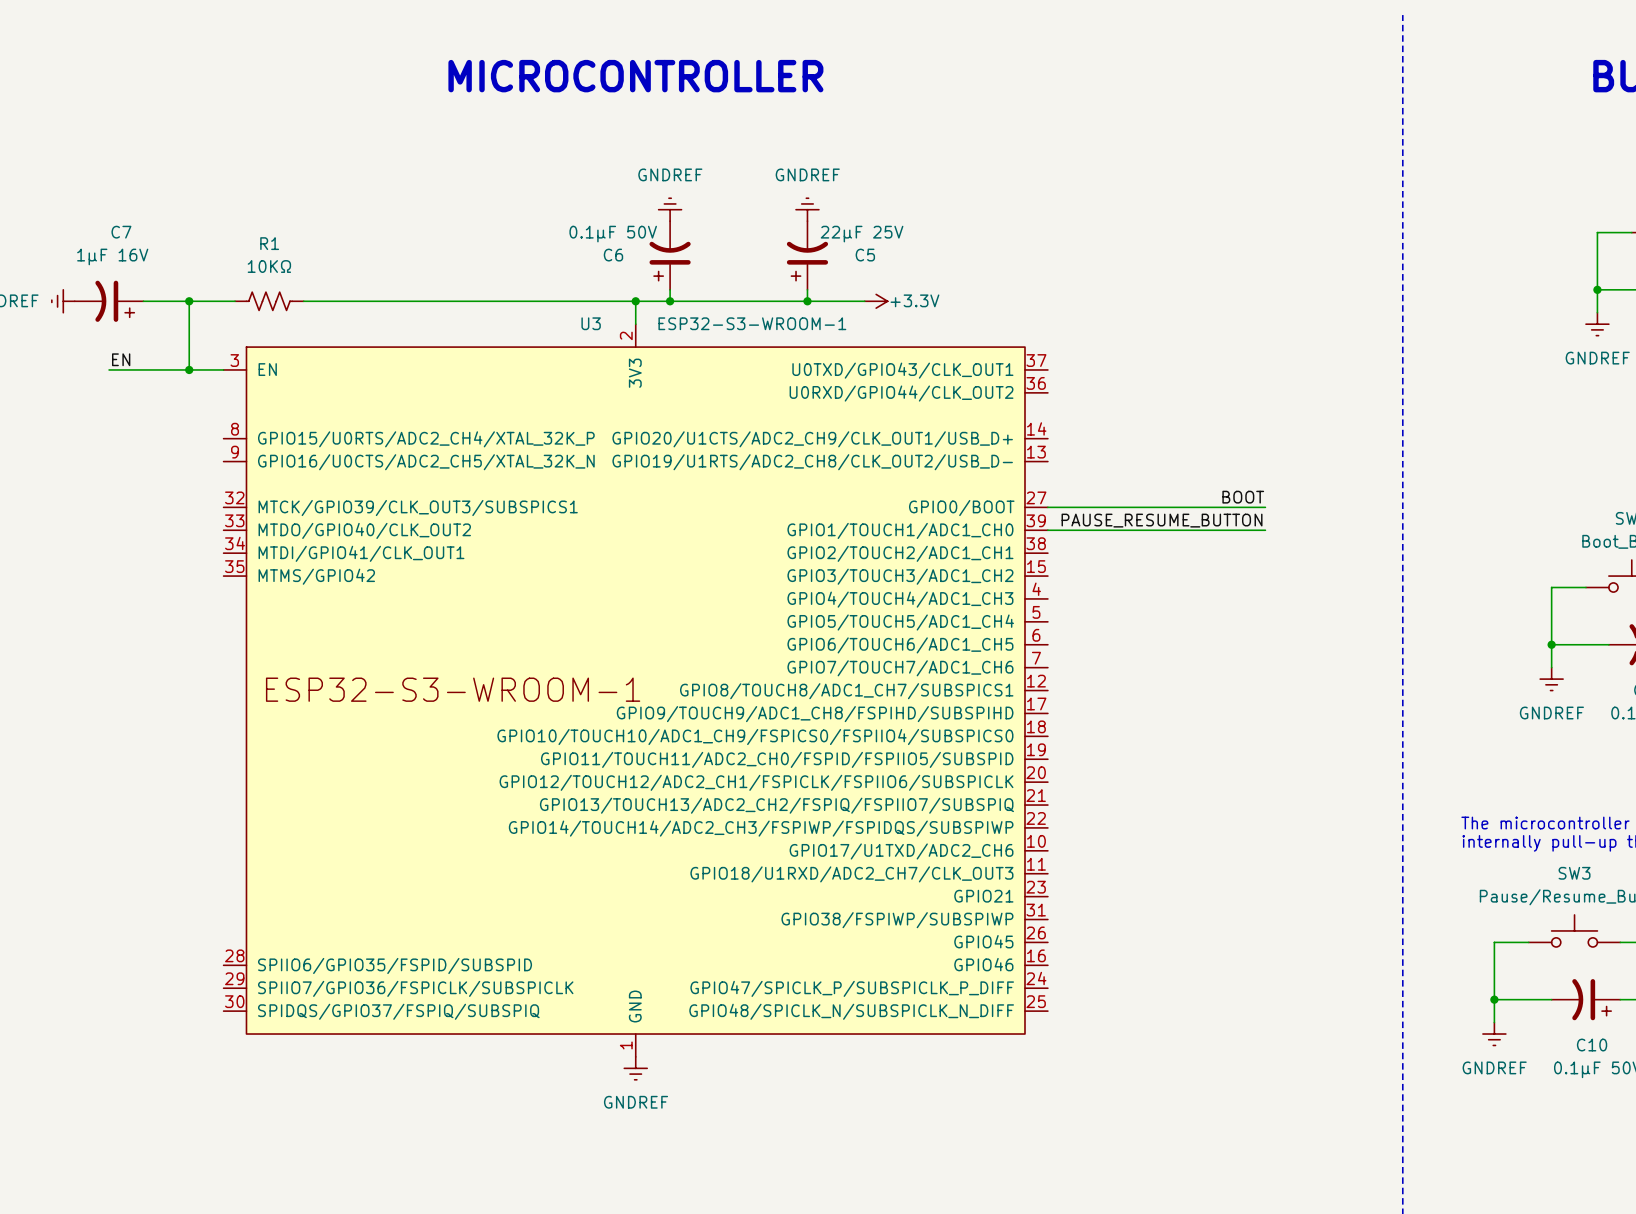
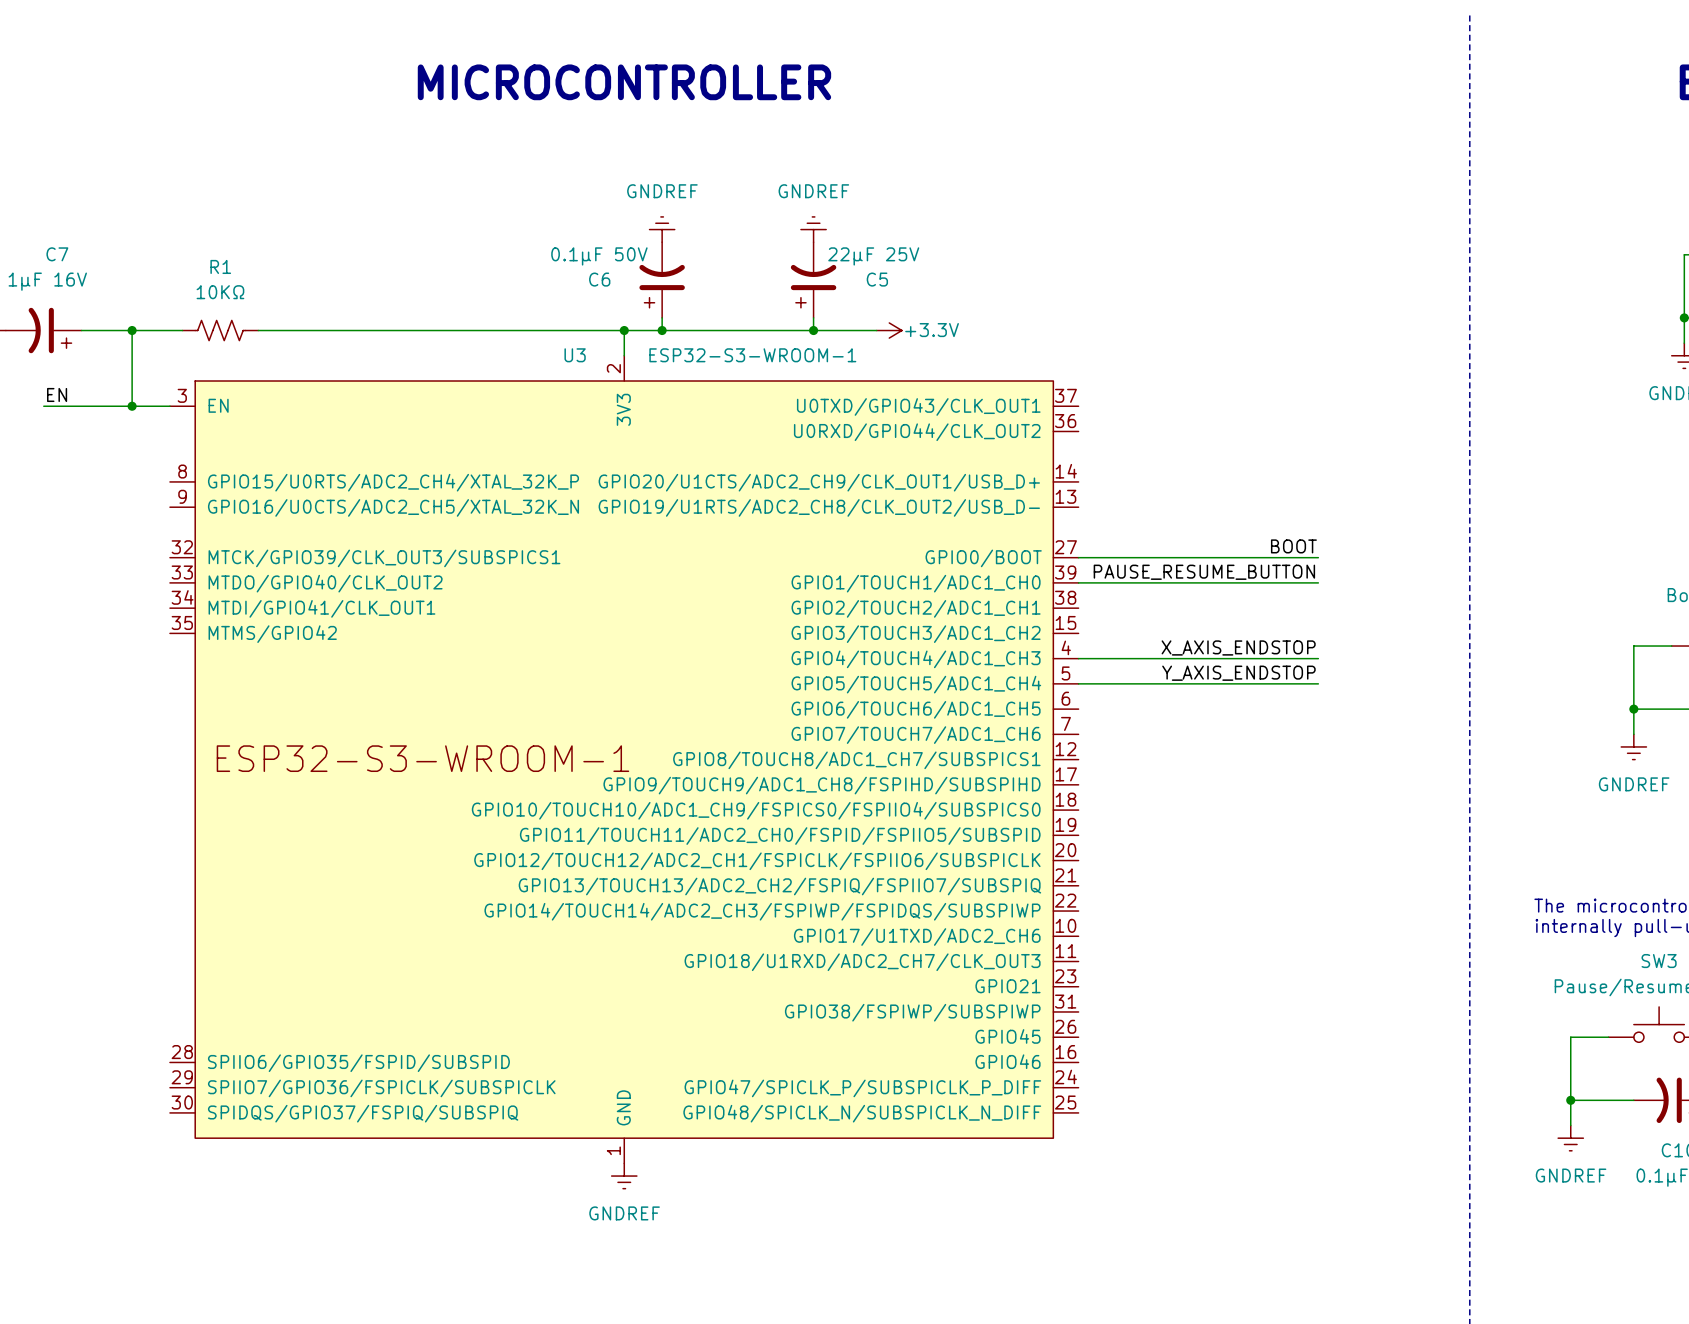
label: none -> X_AXIS_ENDSTOP (1238, 647)
wire: none -> (1078, 658) (1318, 658)
label: none -> Y_AXIS_ENDSTOP (1238, 673)
wire: none -> (1078, 683) (1318, 683)

